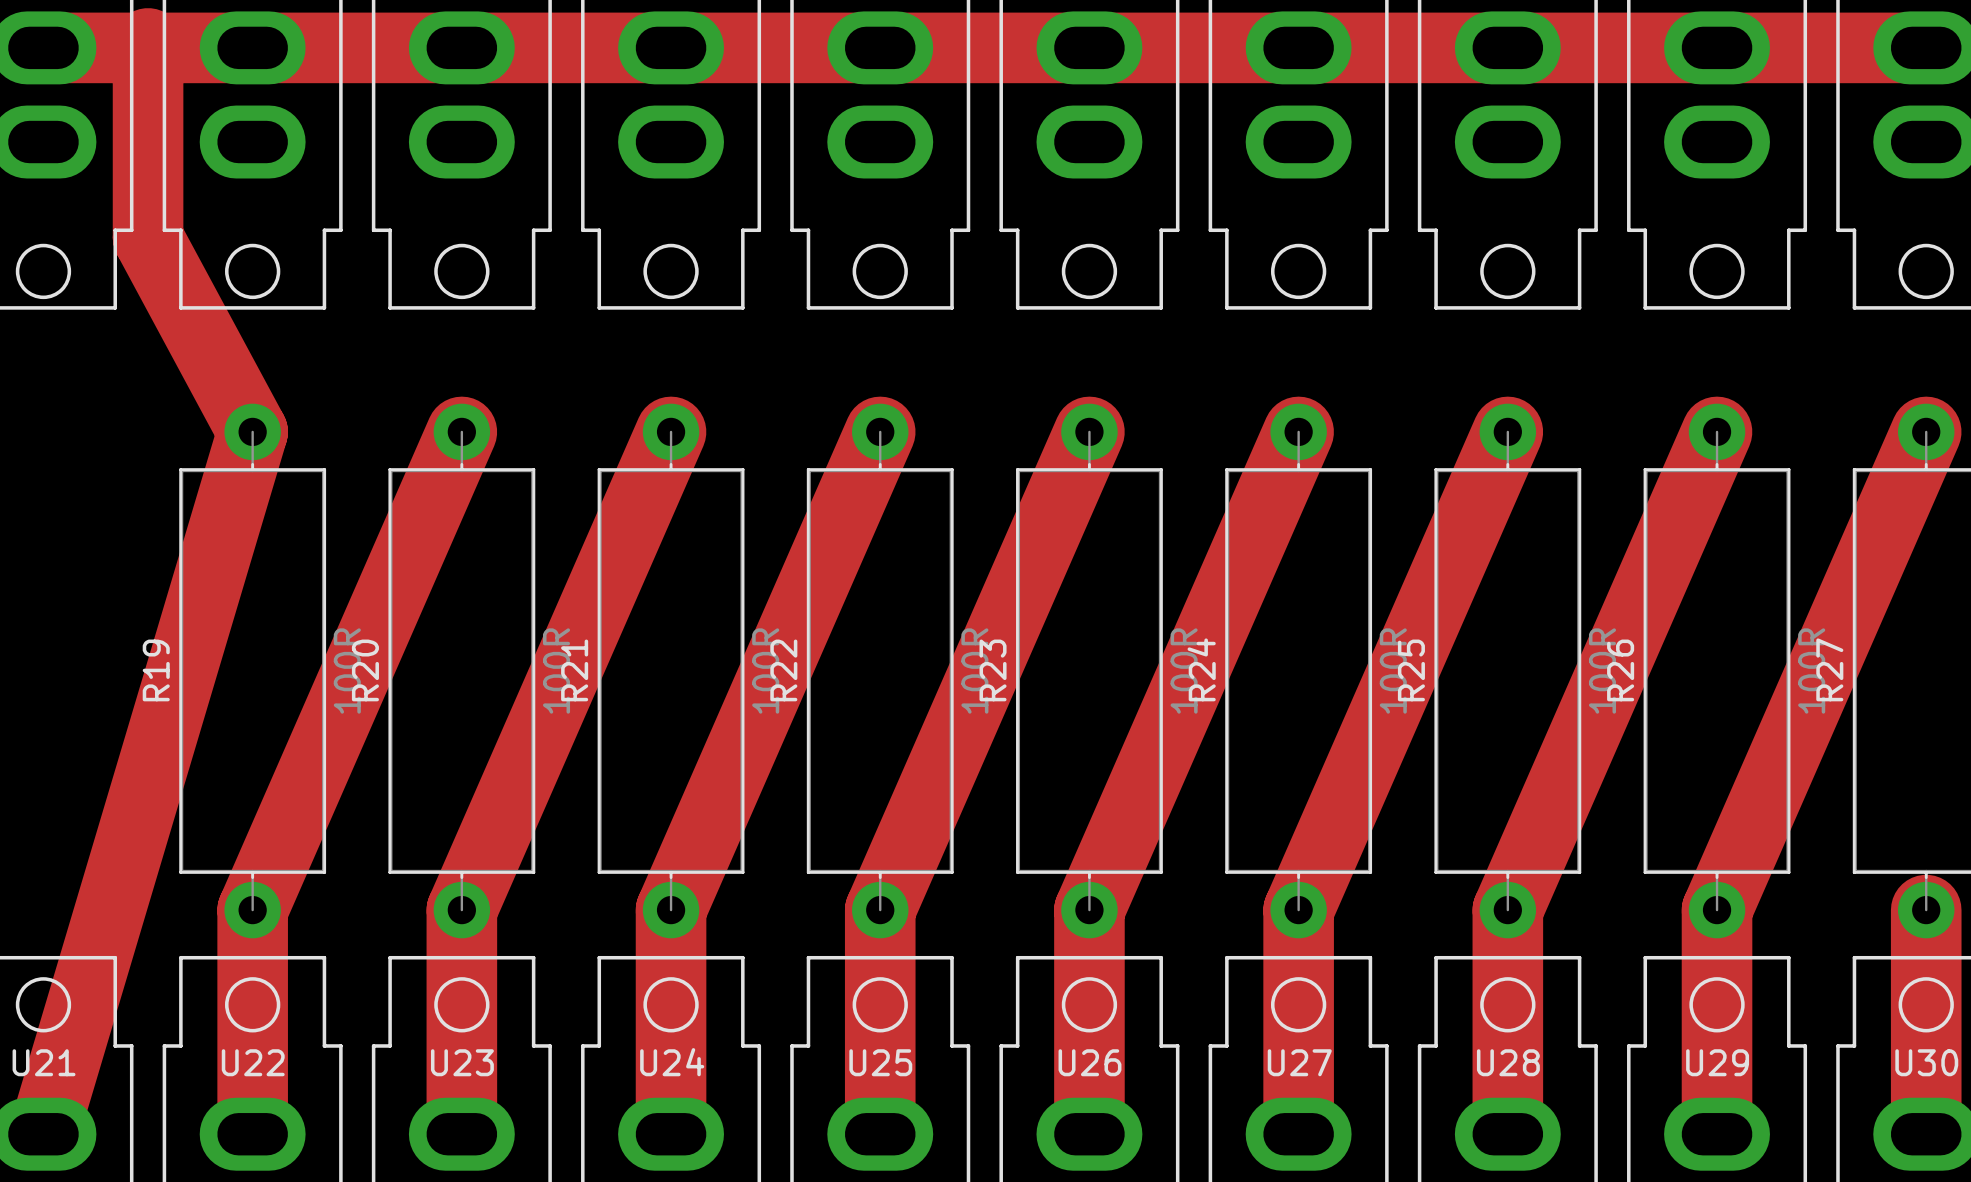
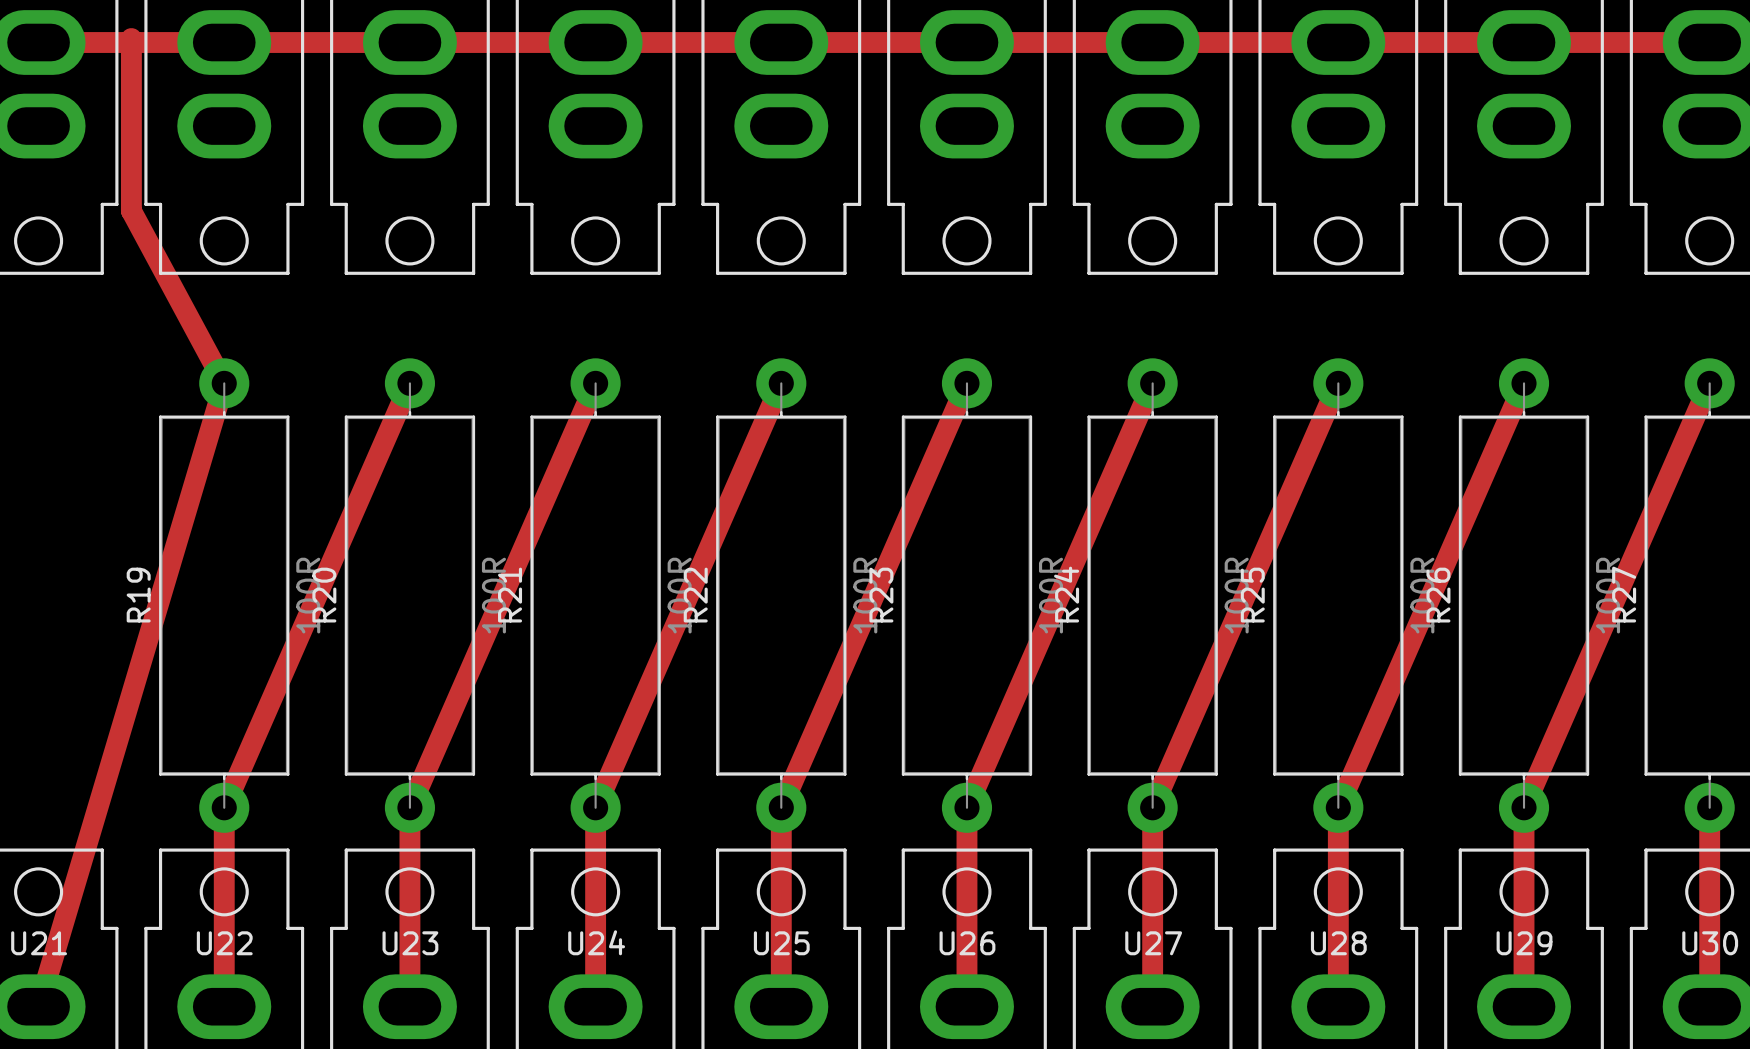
track width: thick (148, 43) (148, 237) (252, 431) (43, 1134) -> thin (131, 38) (131, 210) (224, 383) (38, 1006)
track width: thick (43, 47) (1926, 47) -> thin (38, 42) (1709, 42)
track width: thick (461, 431) (252, 910) (252, 1134) -> thin (409, 383) (224, 807) (224, 1006)
track width: thick (671, 431) (461, 910) (461, 1134) -> thin (595, 383) (409, 807) (409, 1006)
track width: thick (880, 431) (671, 910) (671, 1134) -> thin (781, 383) (595, 807) (595, 1006)
track width: thick (1089, 431) (880, 910) (880, 1134) -> thin (966, 383) (781, 807) (781, 1006)
track width: thick (1298, 431) (1089, 910) (1089, 1134) -> thin (1152, 383) (966, 807) (966, 1006)
track width: thick (1507, 431) (1298, 910) (1298, 1134) -> thin (1338, 383) (1152, 807) (1152, 1006)
track width: thick (1717, 431) (1507, 910) (1507, 1134) -> thin (1524, 383) (1338, 807) (1338, 1006)
track width: thick (1926, 431) (1717, 910) (1717, 1134) -> thin (1709, 383) (1524, 807) (1524, 1006)
track width: thick (1926, 910) (1926, 1134) -> thin (1709, 807) (1709, 1006)

